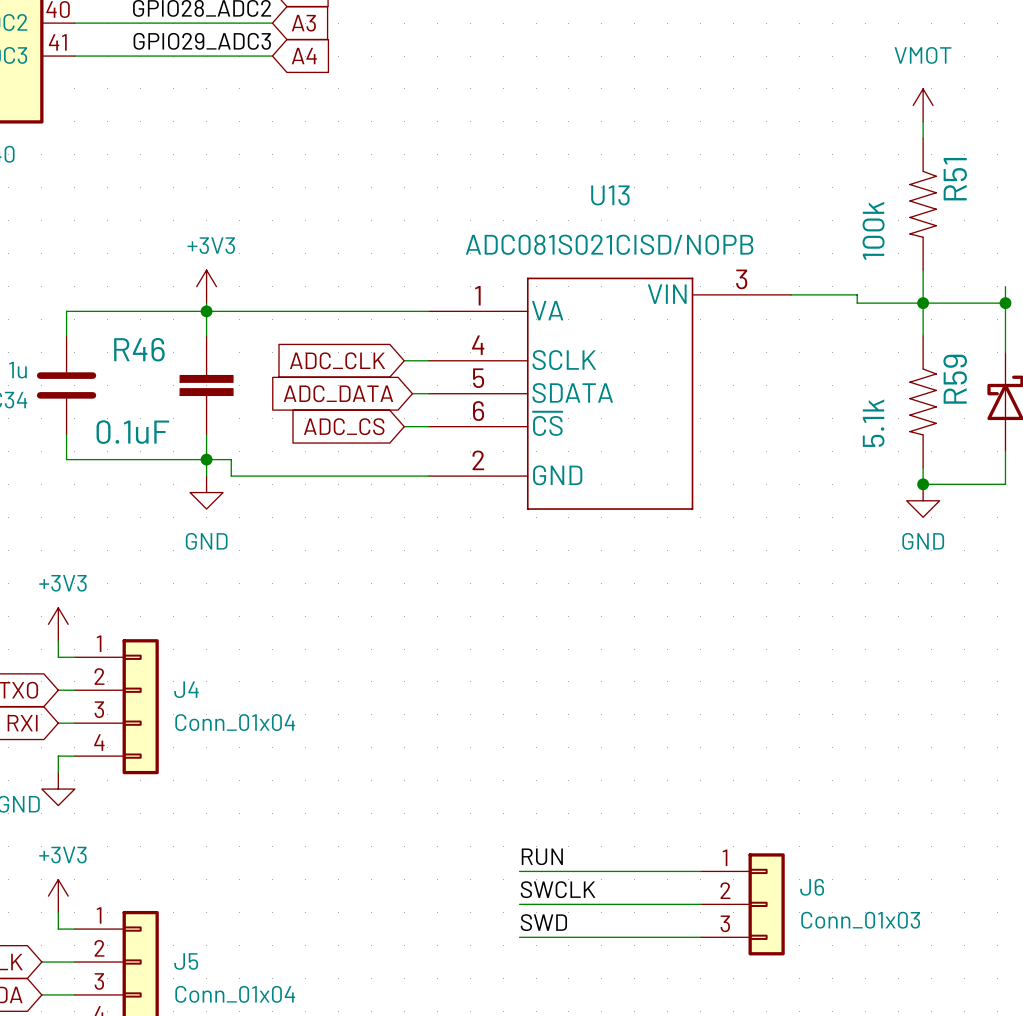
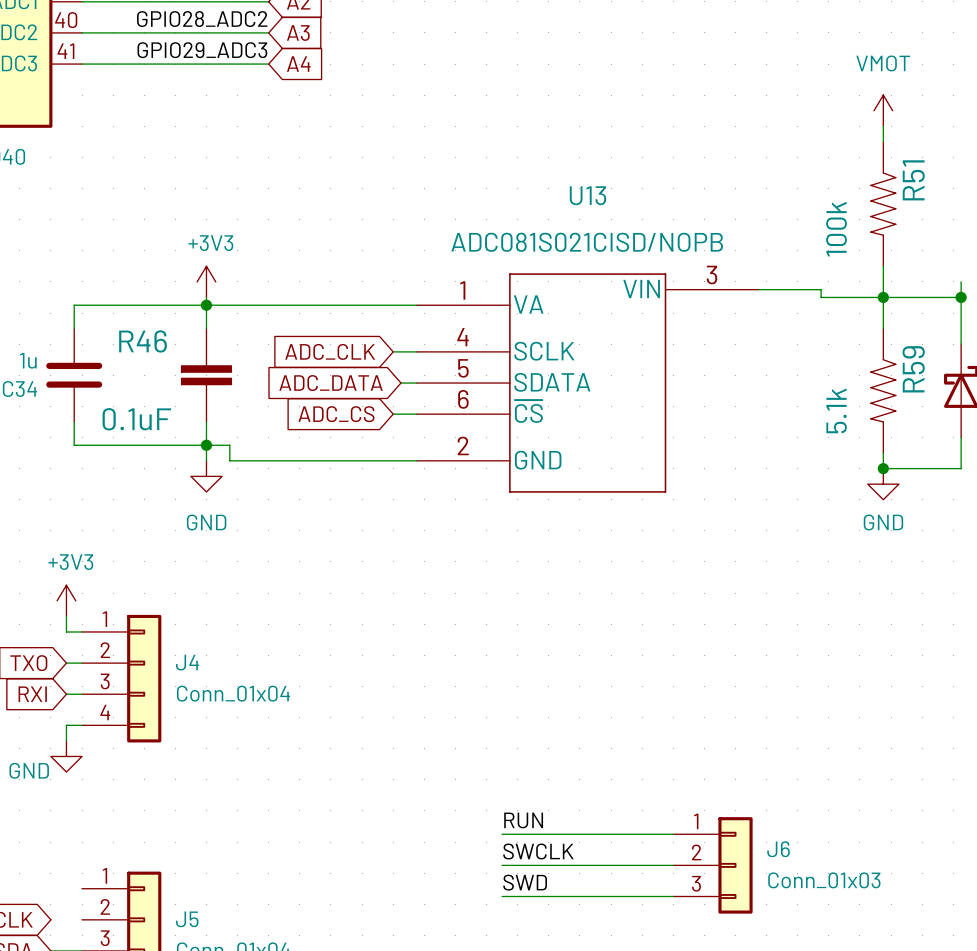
power symbol: +3V3 (58, 896) -> none
wire: (58, 912) (58, 929) (74, 929) -> none
wire: (41, 962) (74, 962) -> none

